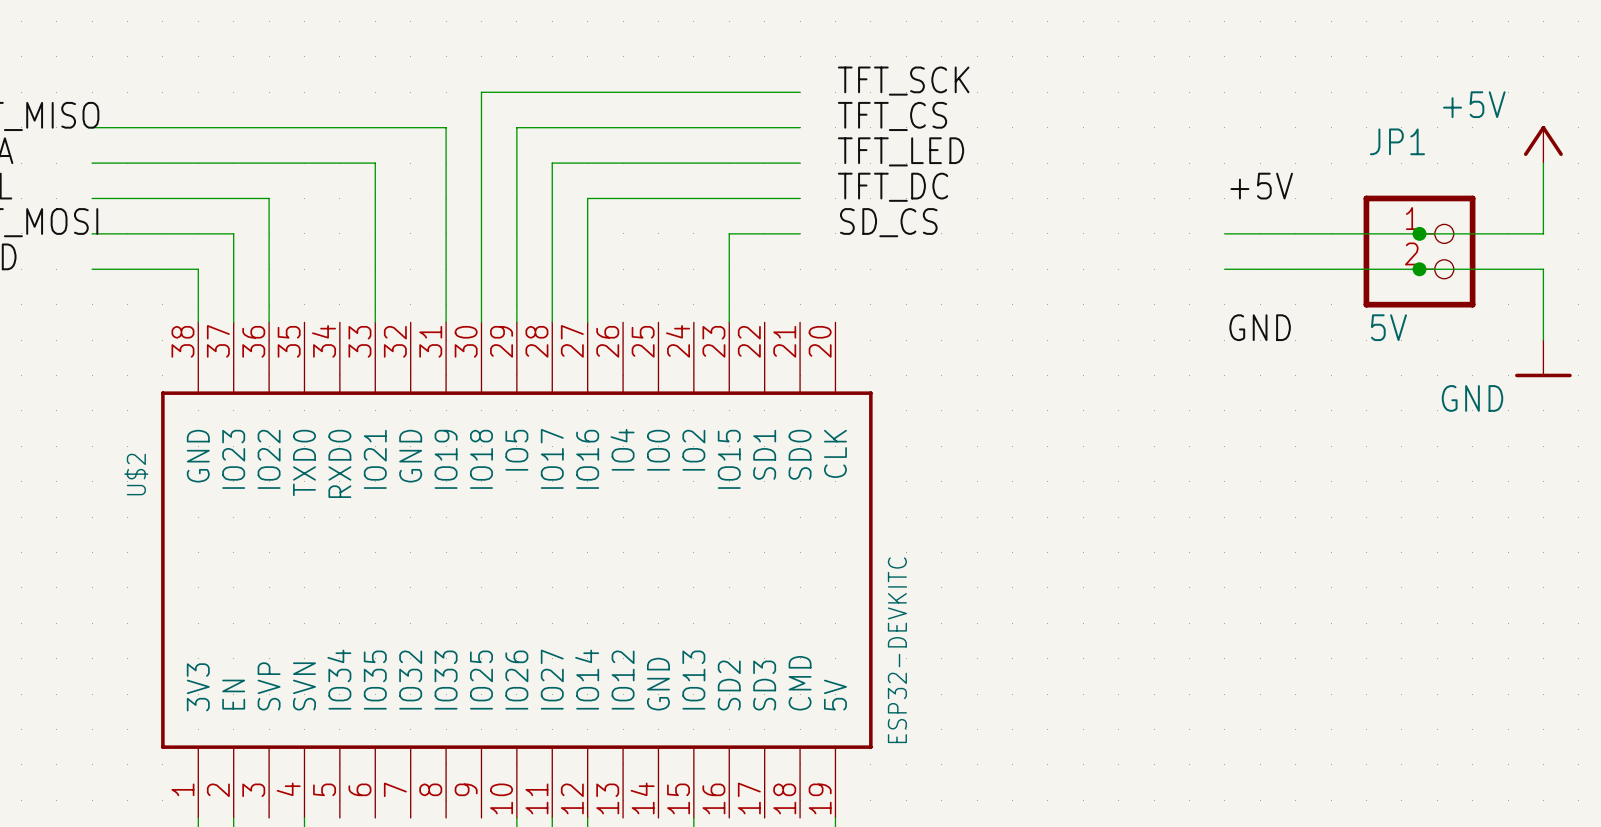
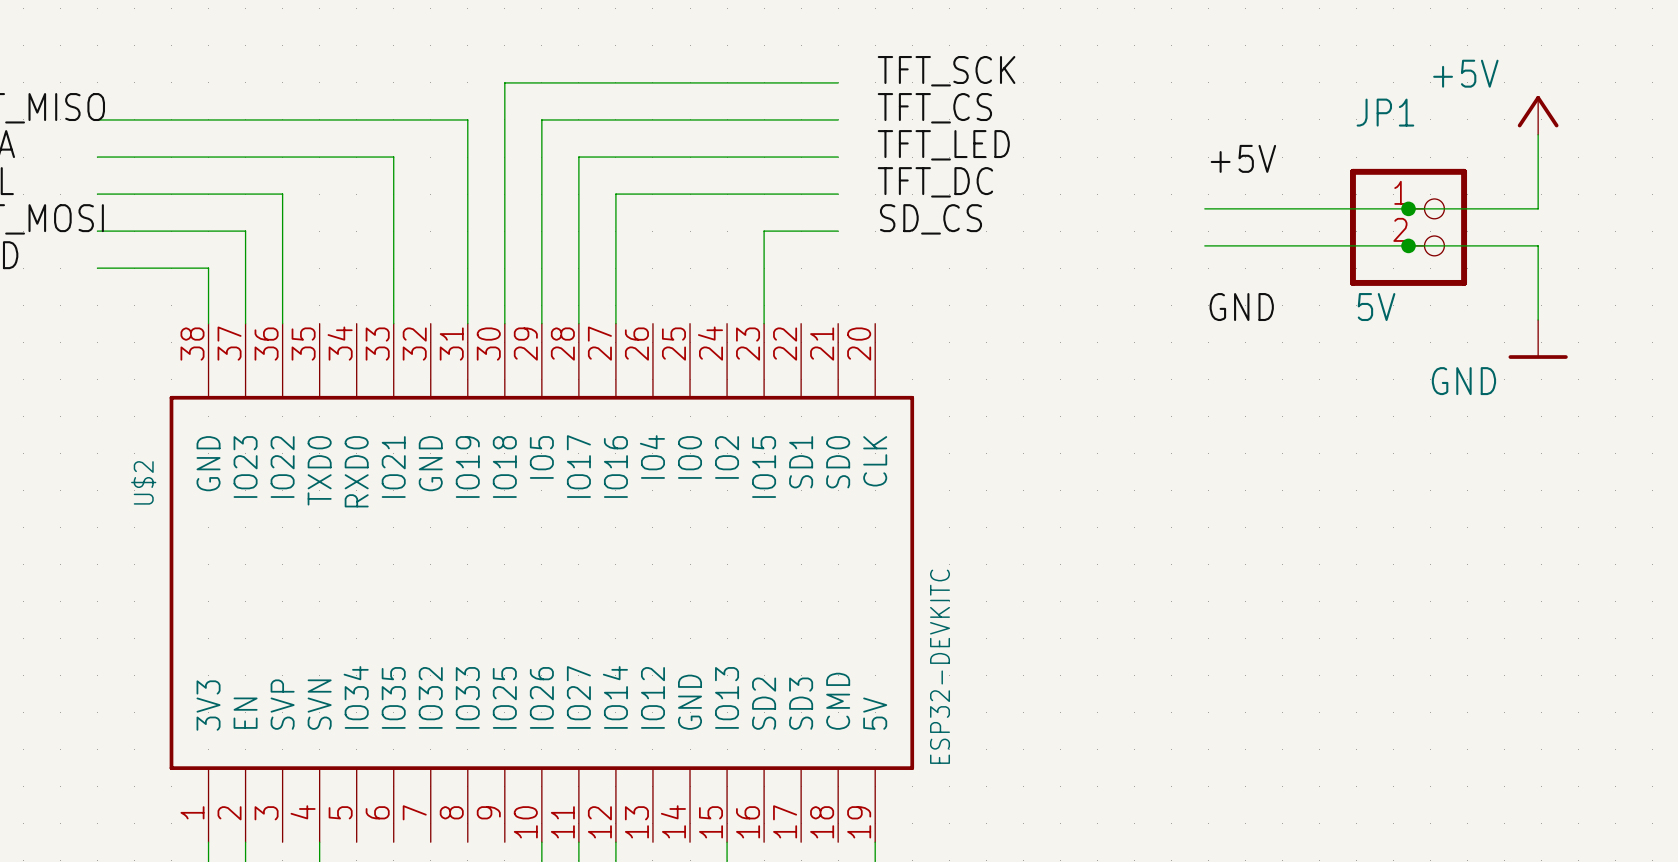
power symbol position: +5V (1543, 144) -> +5V (1538, 115)
wire: (1543, 163) (1543, 233) (1224, 233) -> (1538, 134) (1538, 208) (1204, 208)
label position: +5V (1261, 186) -> +5V (1243, 158)
junction: none -> (1408, 208)
junction: (1419, 233) -> none
junction: none -> (1408, 245)
JP1 position: (1419, 251) -> (1408, 227)
wire: (1224, 269) (1543, 269) (1543, 340) -> (1204, 245) (1538, 245) (1538, 319)
junction: (1419, 269) -> none
label position: GND (1260, 327) -> GND (1241, 307)
power symbol position: GND (1543, 358) -> GND (1538, 339)

